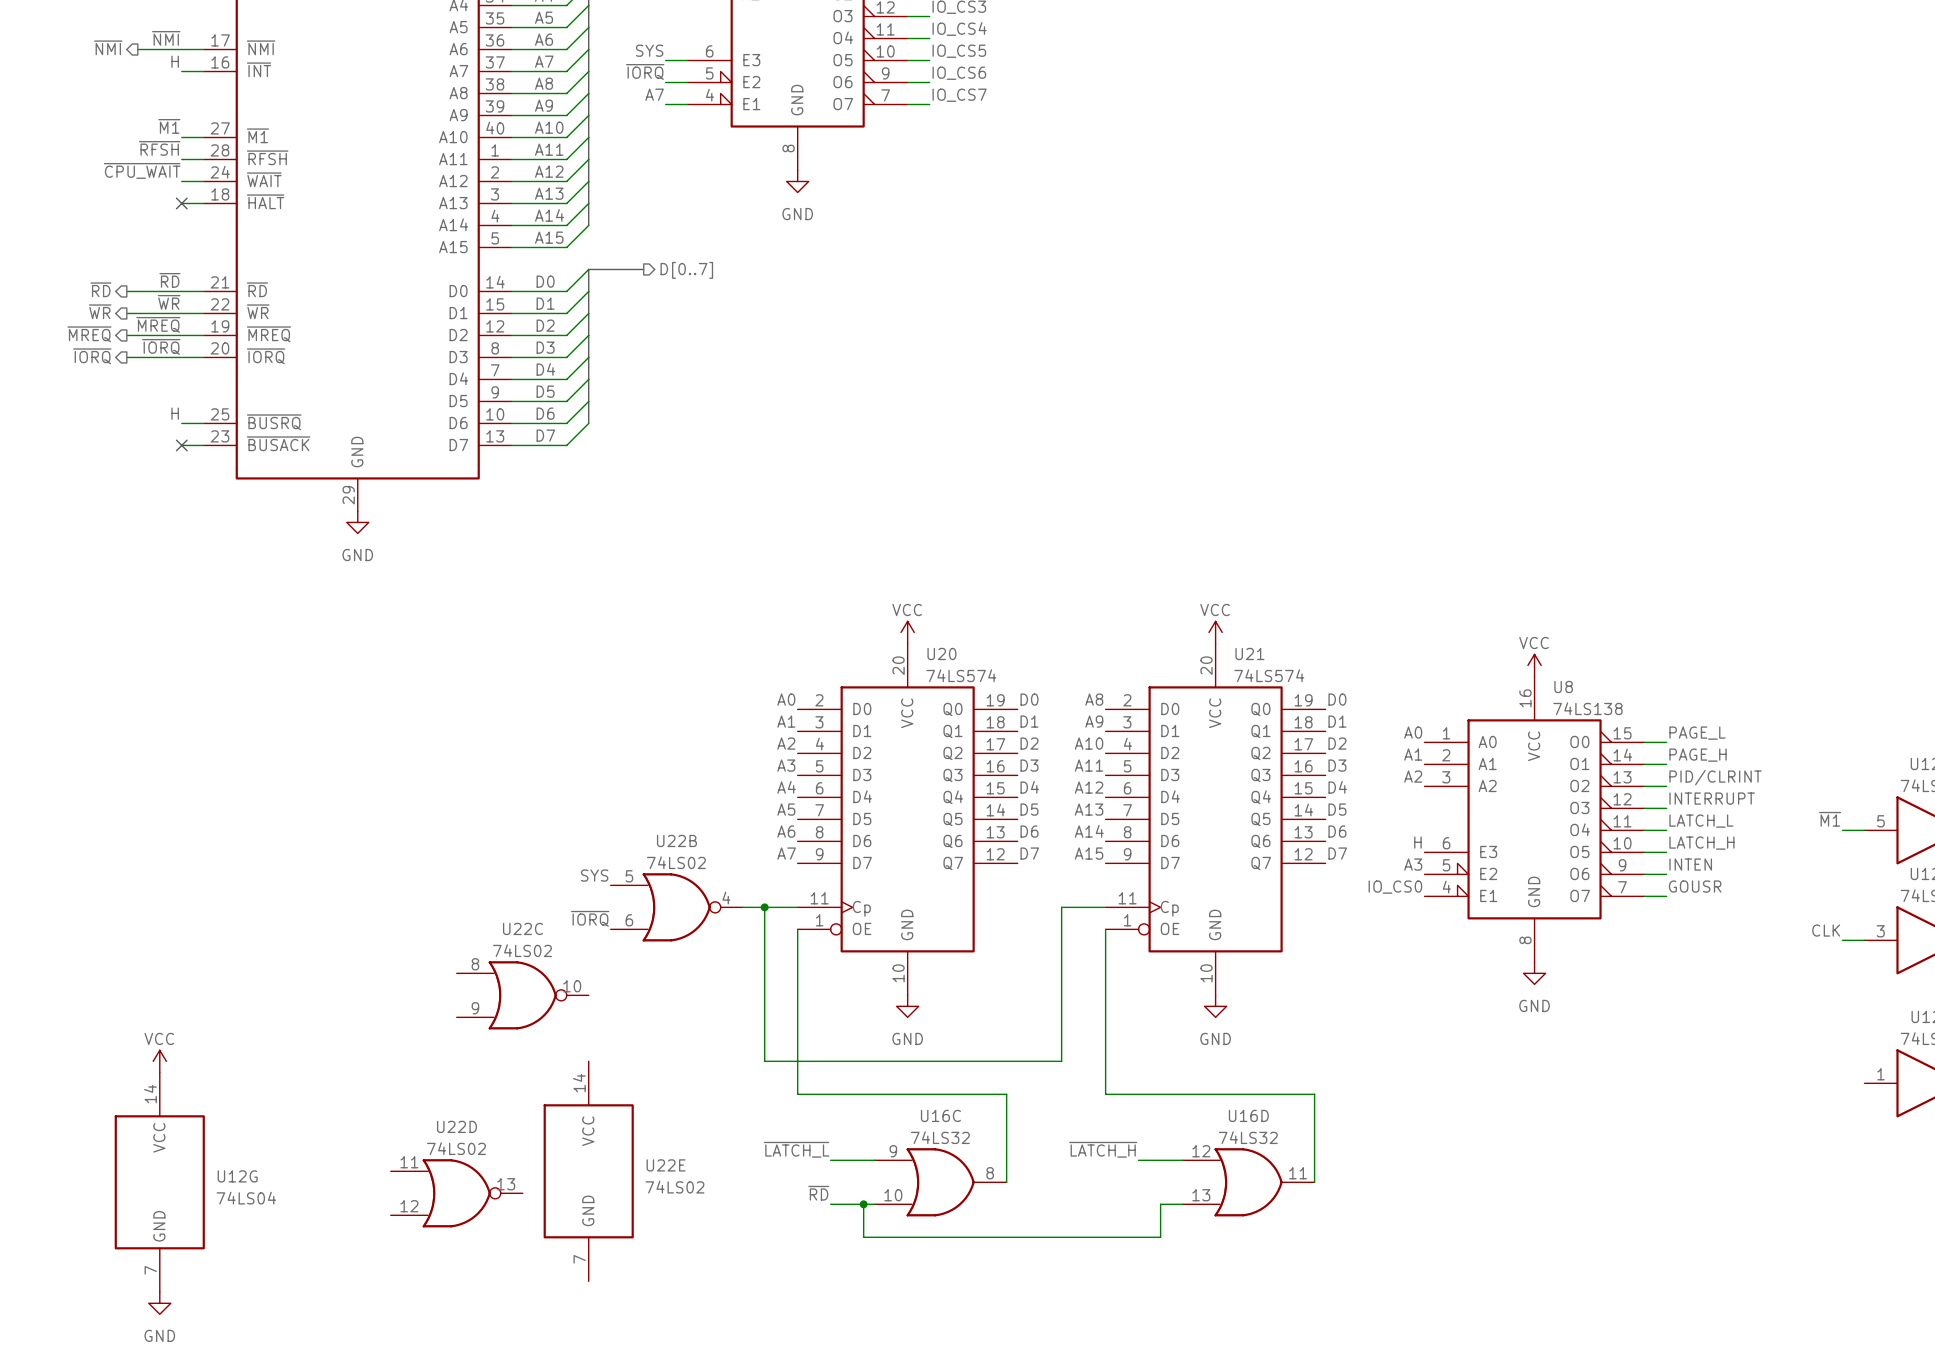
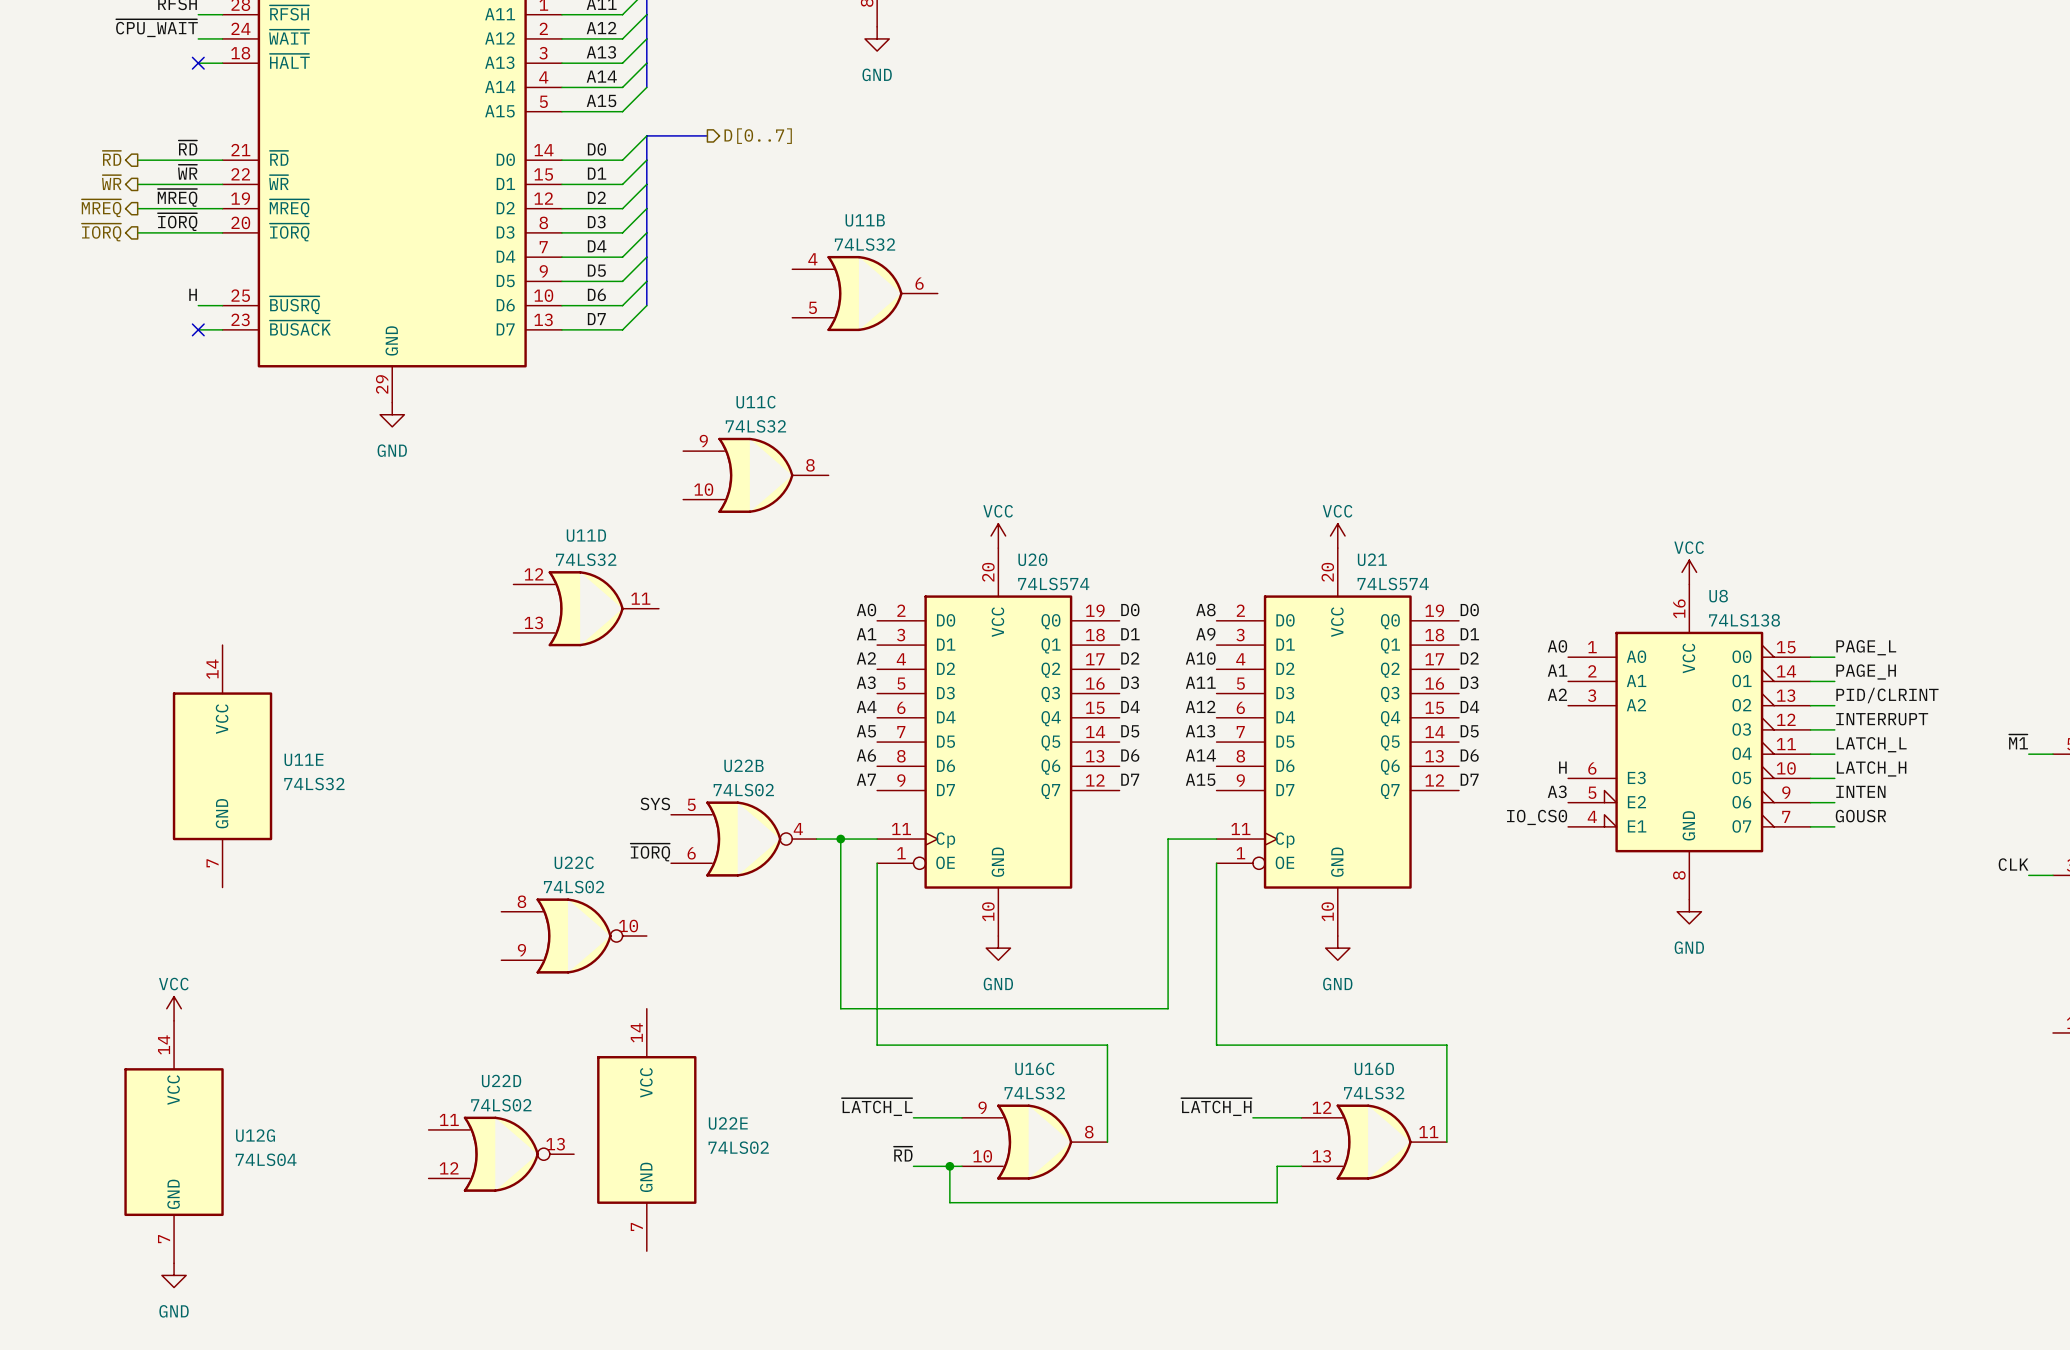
U11B: none -> 74LS32 (865, 293)
U11C: none -> 74LS32 (755, 475)
U11D: none -> 74LS32 (586, 608)
U11E: none -> 74LS32 (222, 766)

